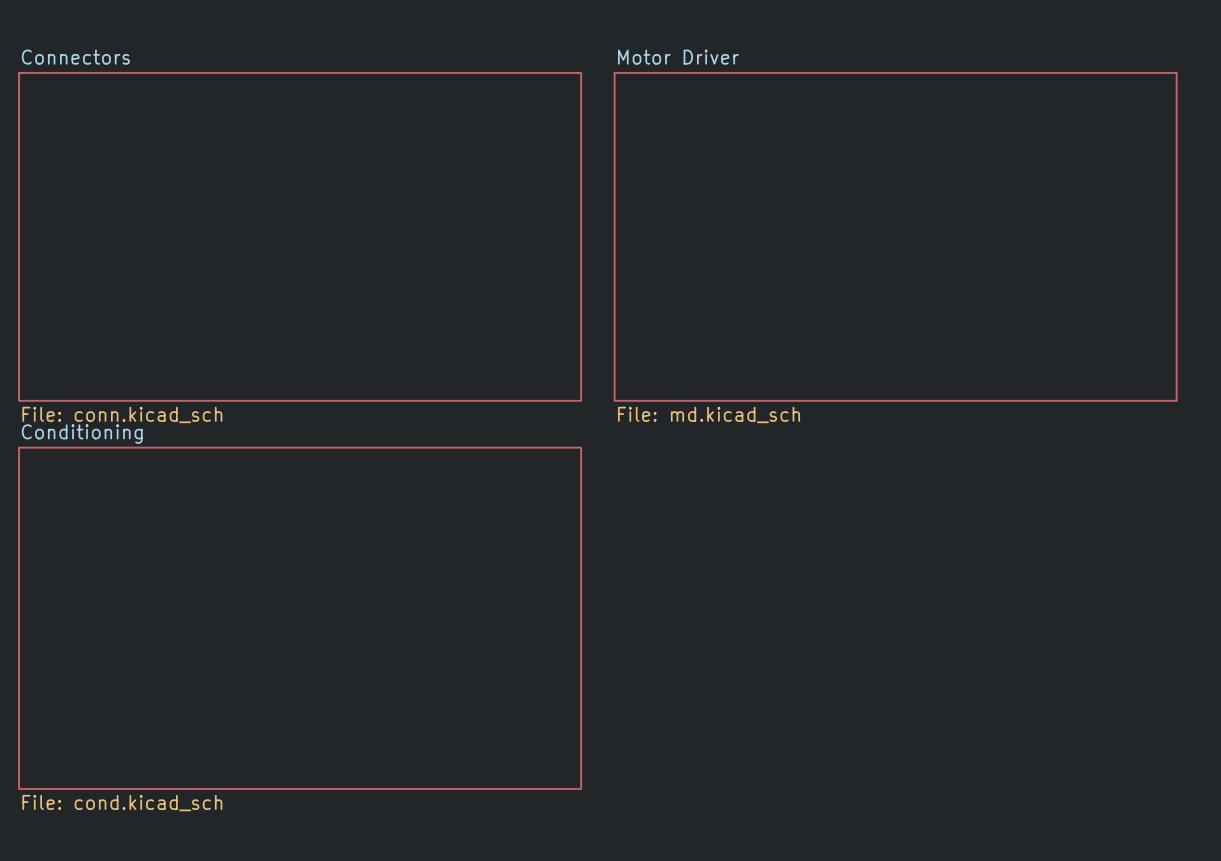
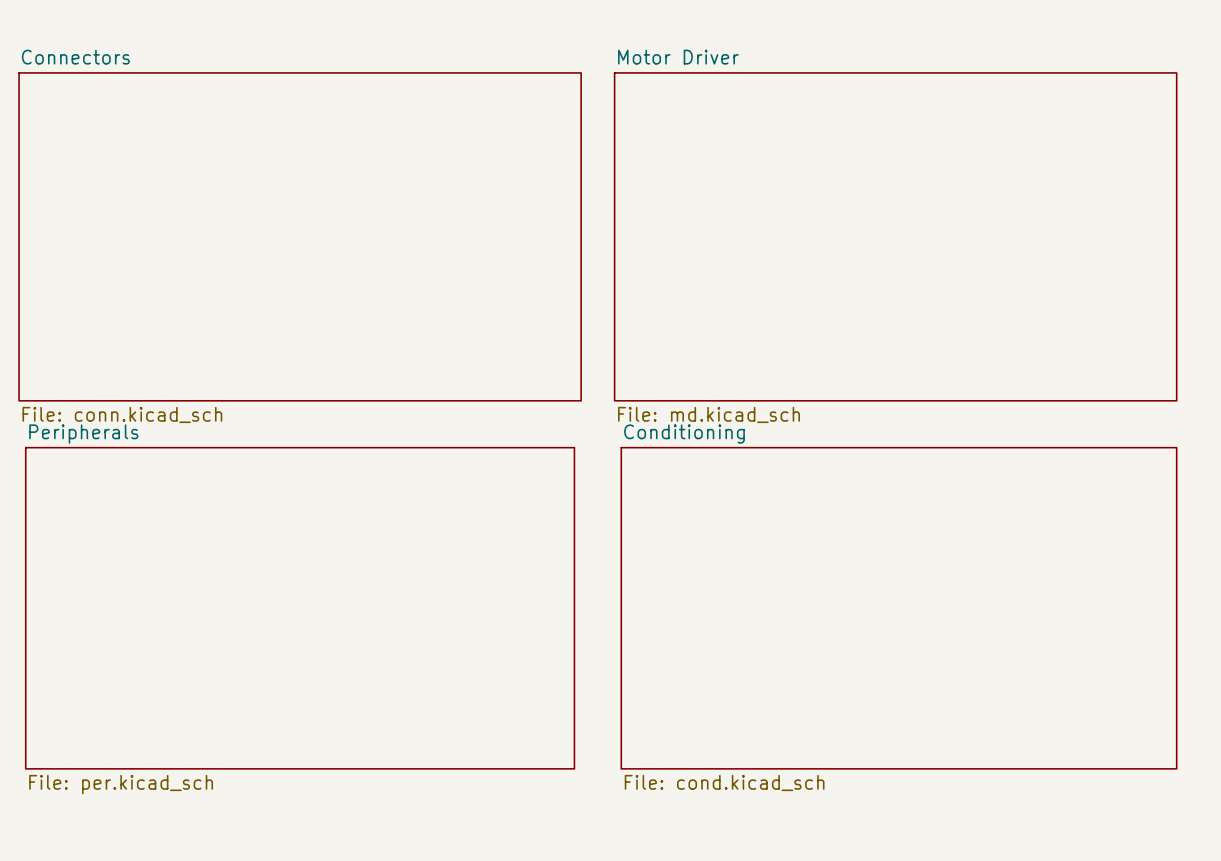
sheet Peripherals: none -> File: per.kicad_sch (300, 608)
sheet Conditioning: none -> File: cond.kicad_sch (898, 608)
sheet Conditioning: File: cond.kicad_sch (300, 618) -> none

